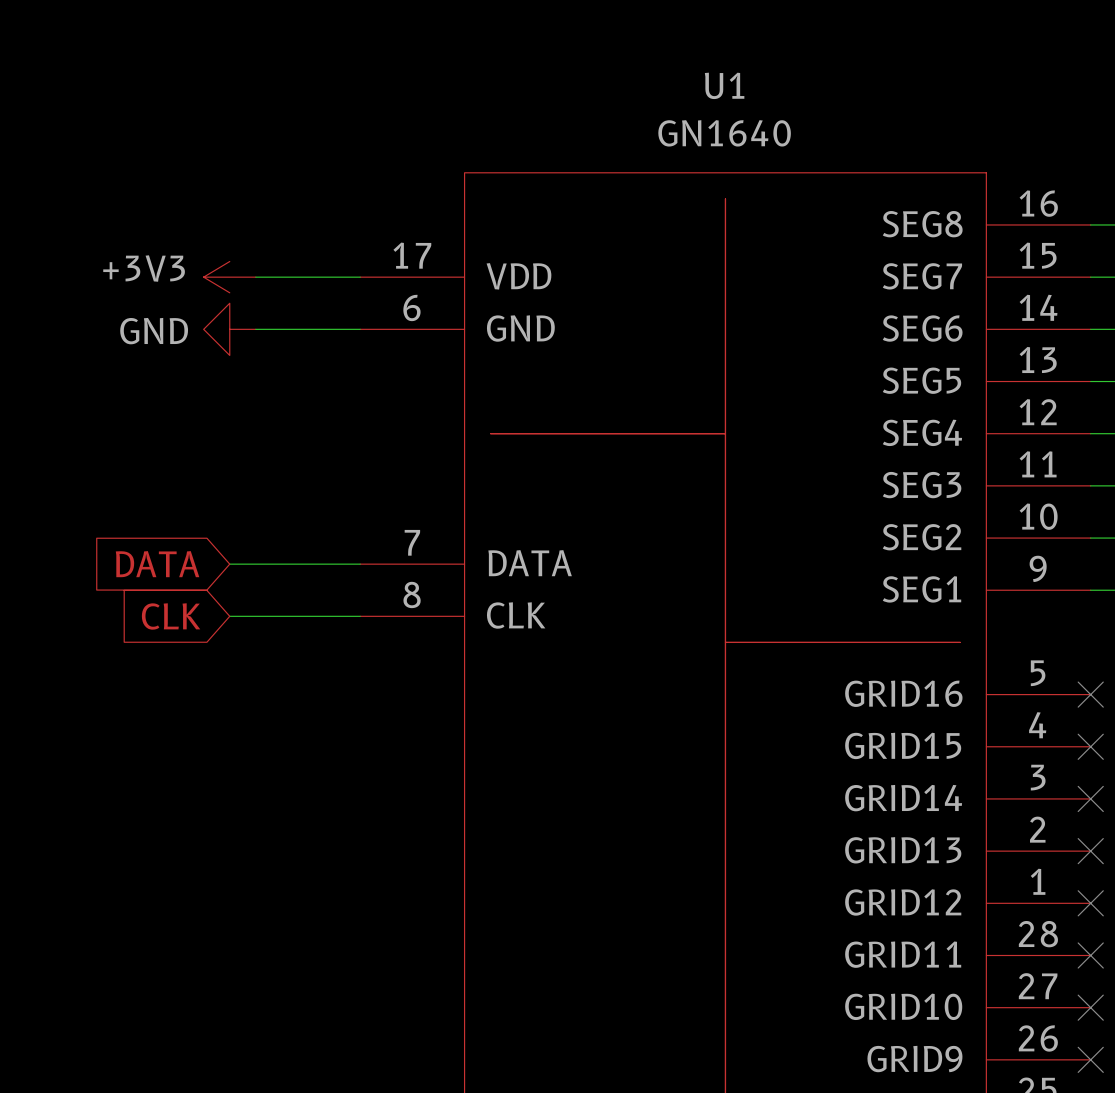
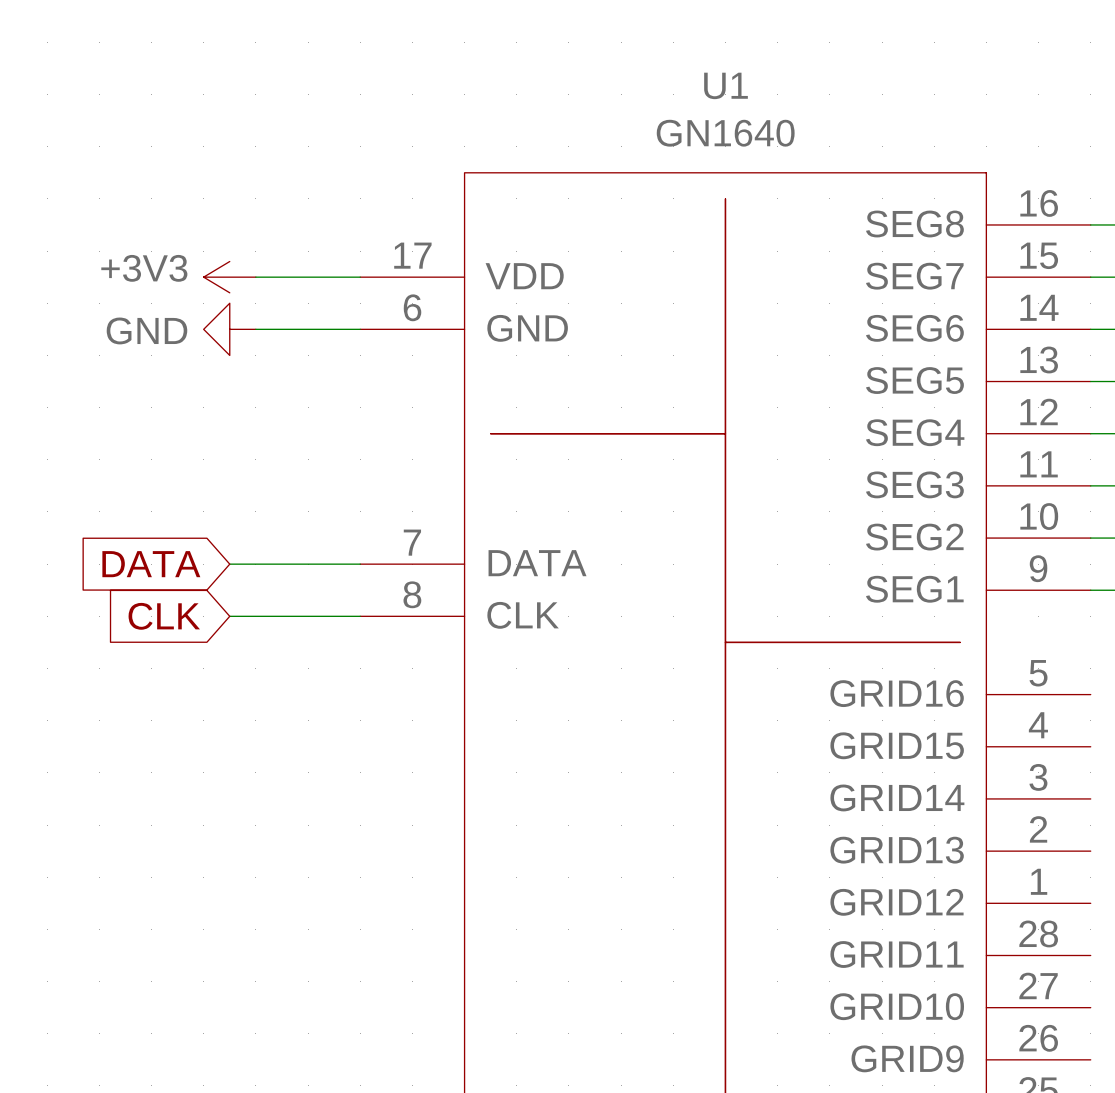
no-connect mark: (1090, 694) -> none
no-connect mark: (1090, 746) -> none
no-connect mark: (1090, 798) -> none
no-connect mark: (1090, 851) -> none
no-connect mark: (1090, 903) -> none
no-connect mark: (1090, 955) -> none
no-connect mark: (1090, 1007) -> none
no-connect mark: (1090, 1059) -> none

